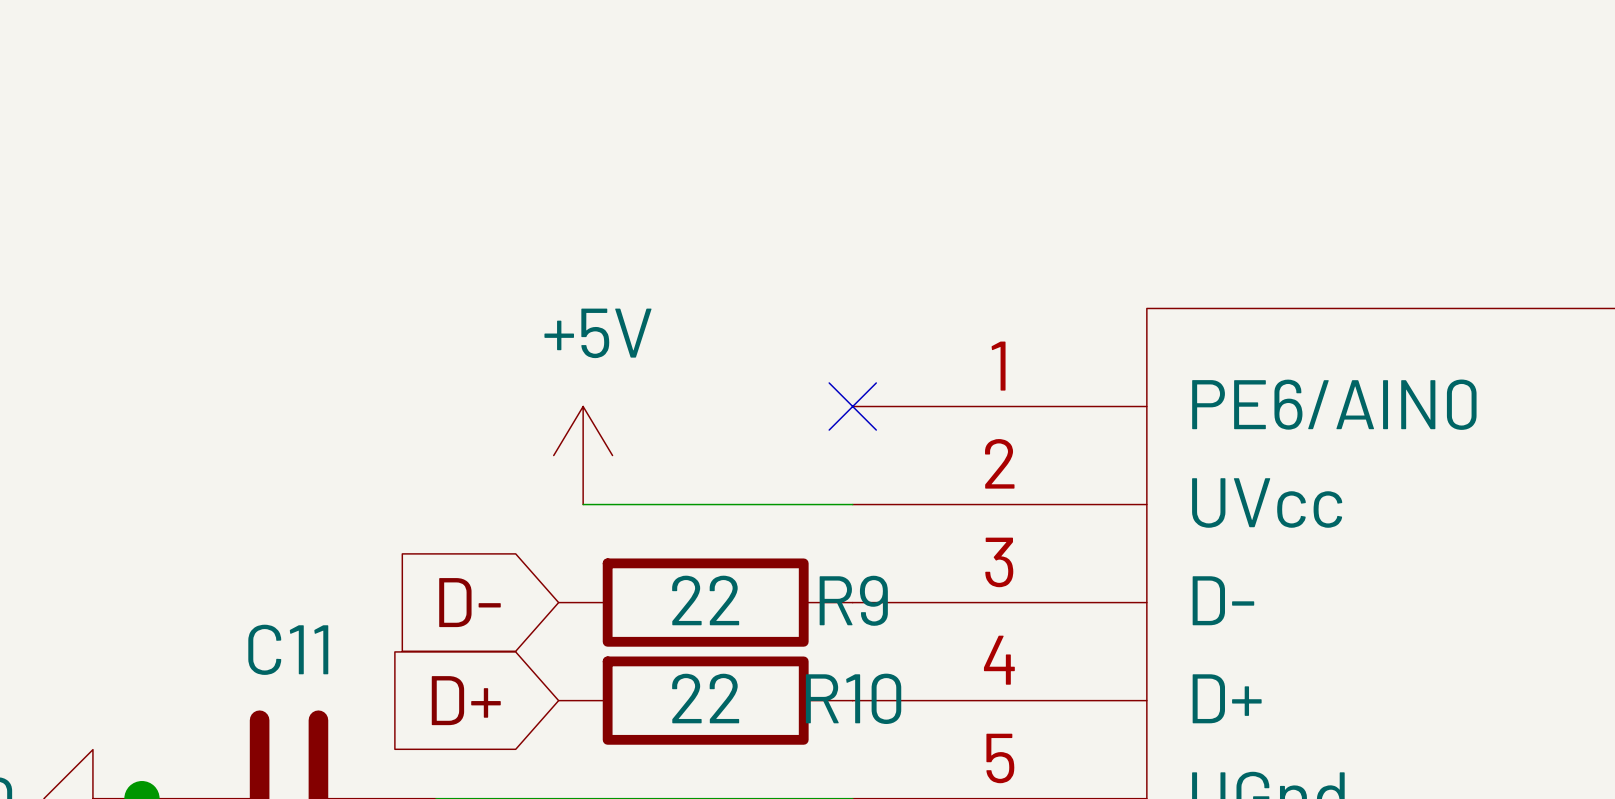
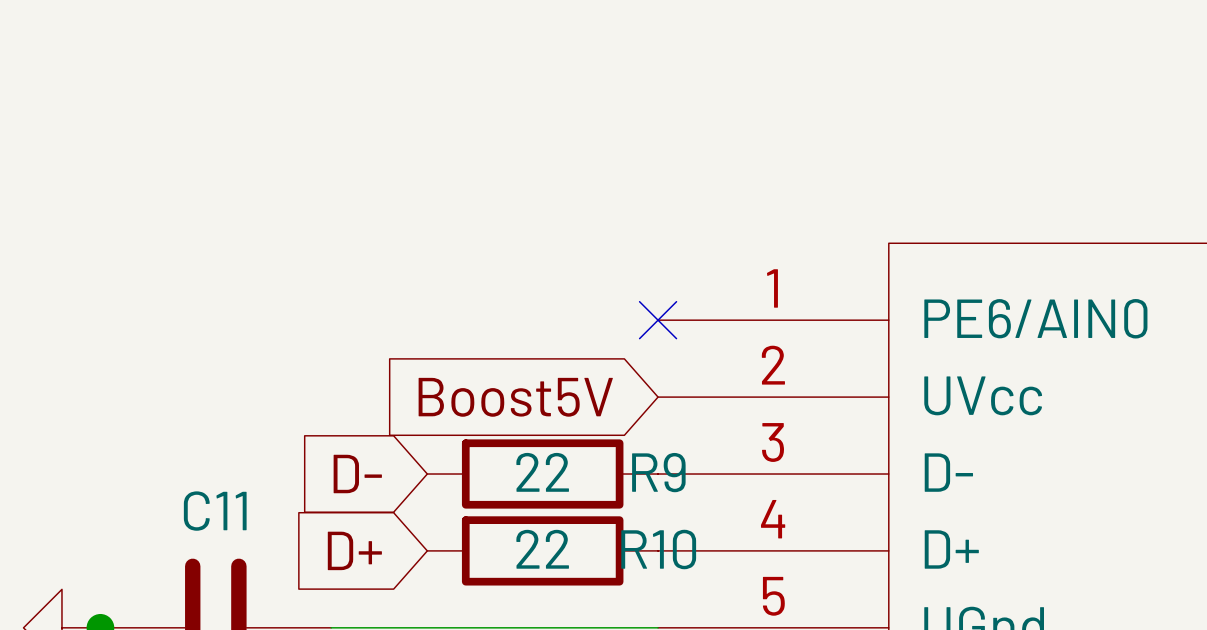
power symbol: +5V (583, 455) -> none
wire: (583, 504) (852, 504) -> none
global label: none -> Boost5V (515, 397)

